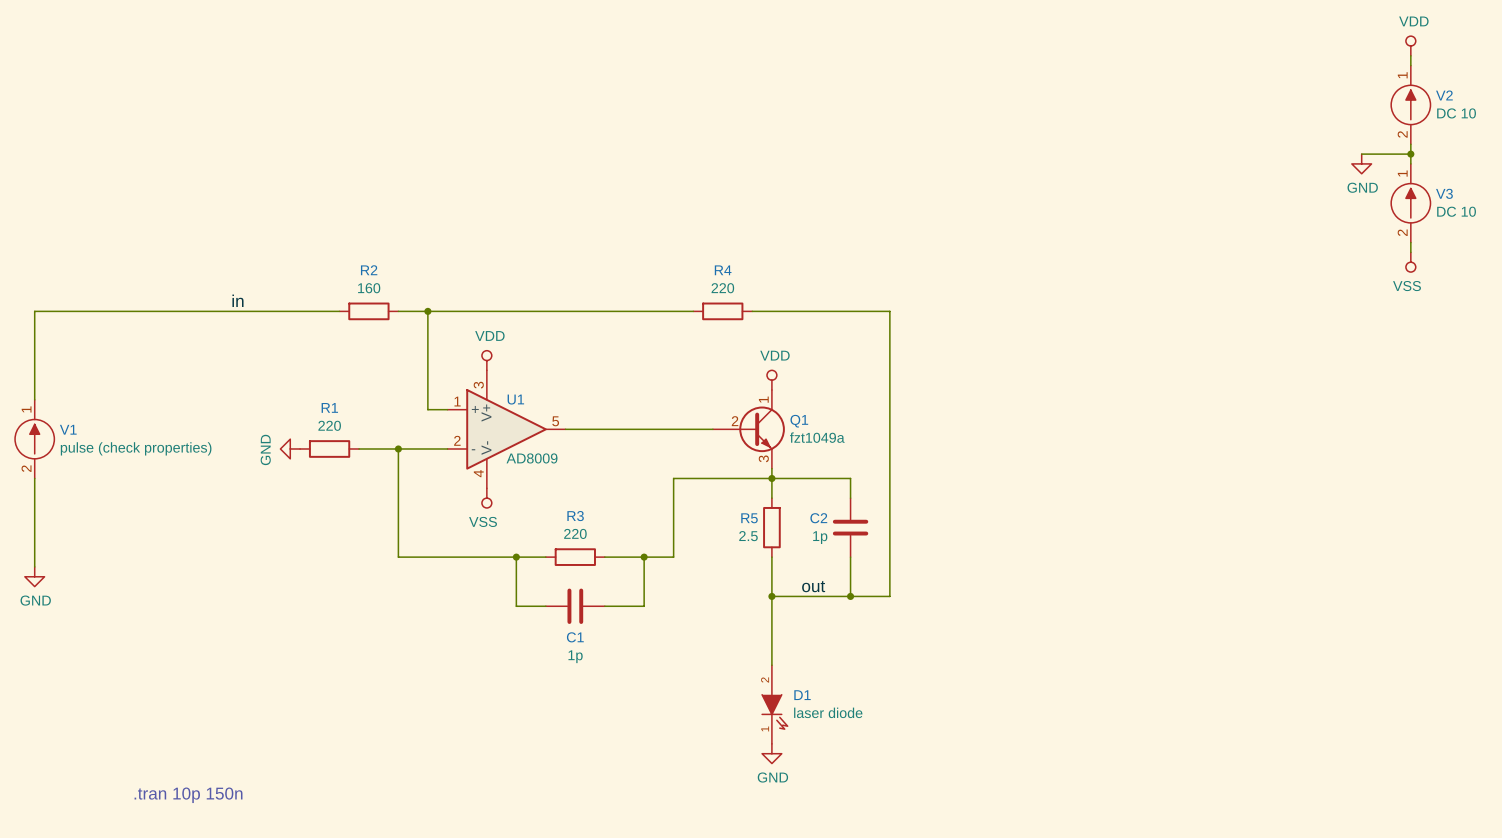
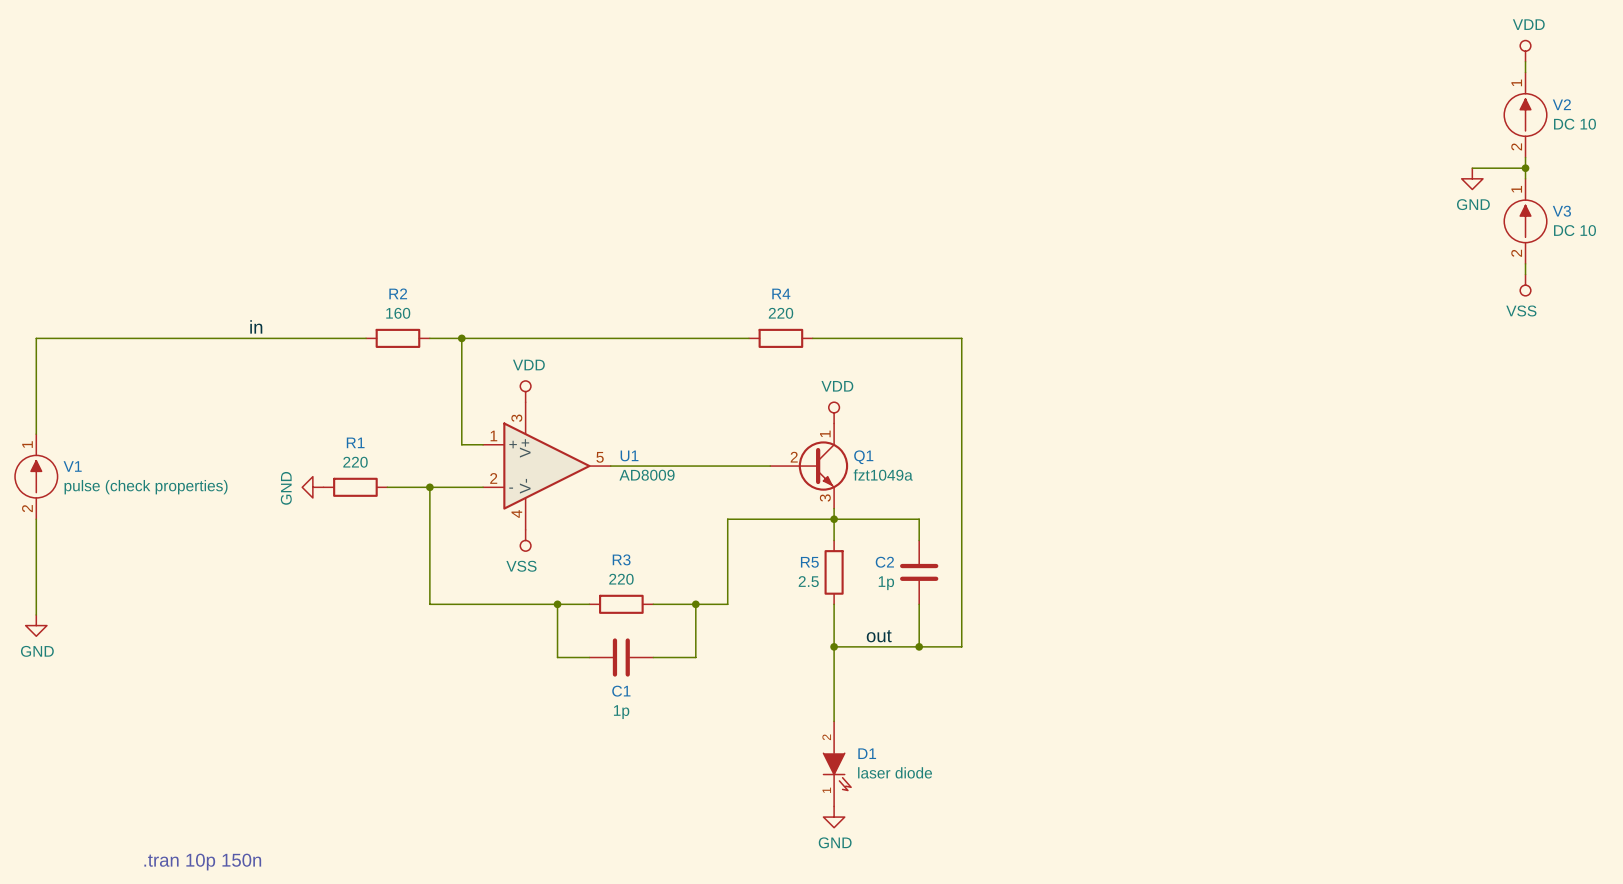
U1 name position: U1 (515, 399) -> U1 (629, 455)
U1 value position: AD8009 (532, 458) -> AD8009 (647, 475)

